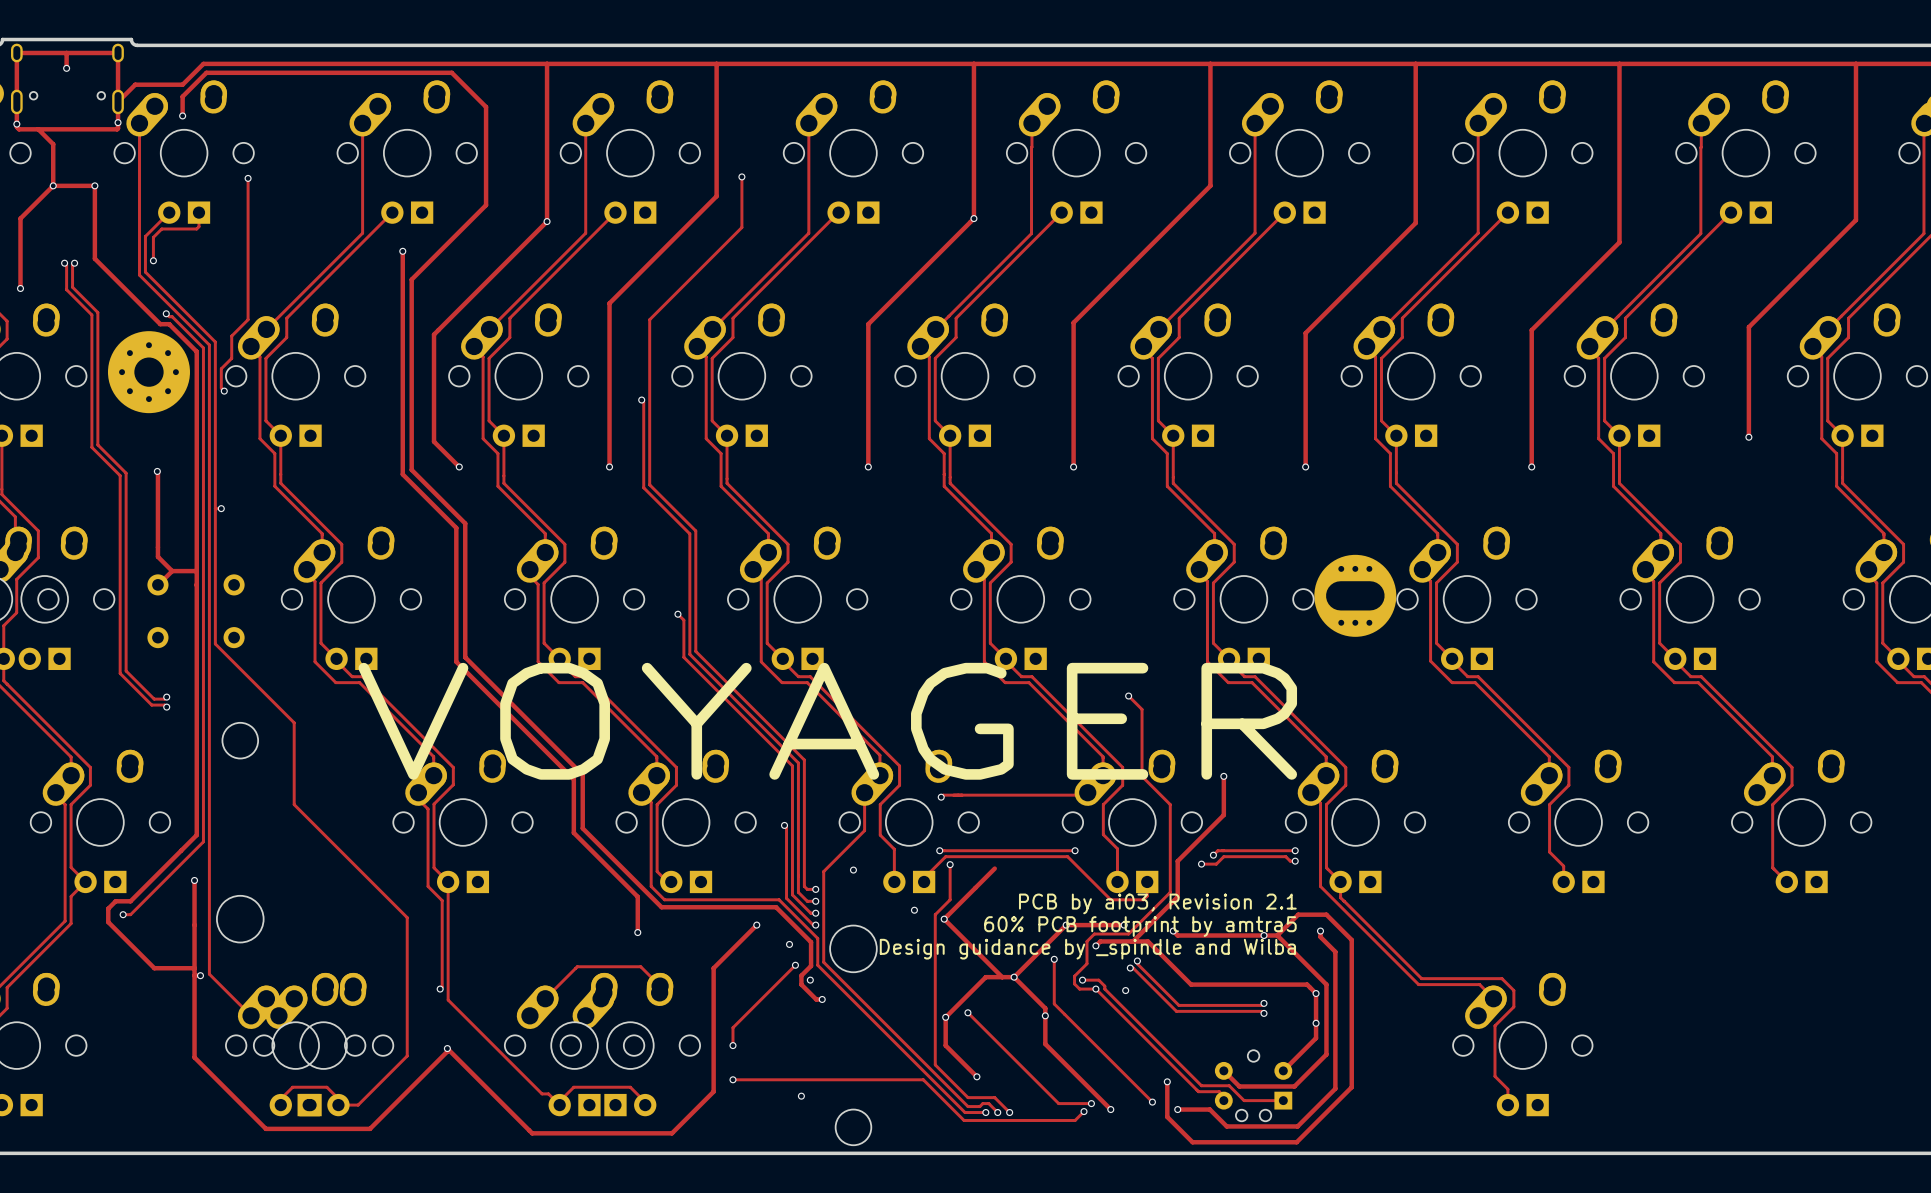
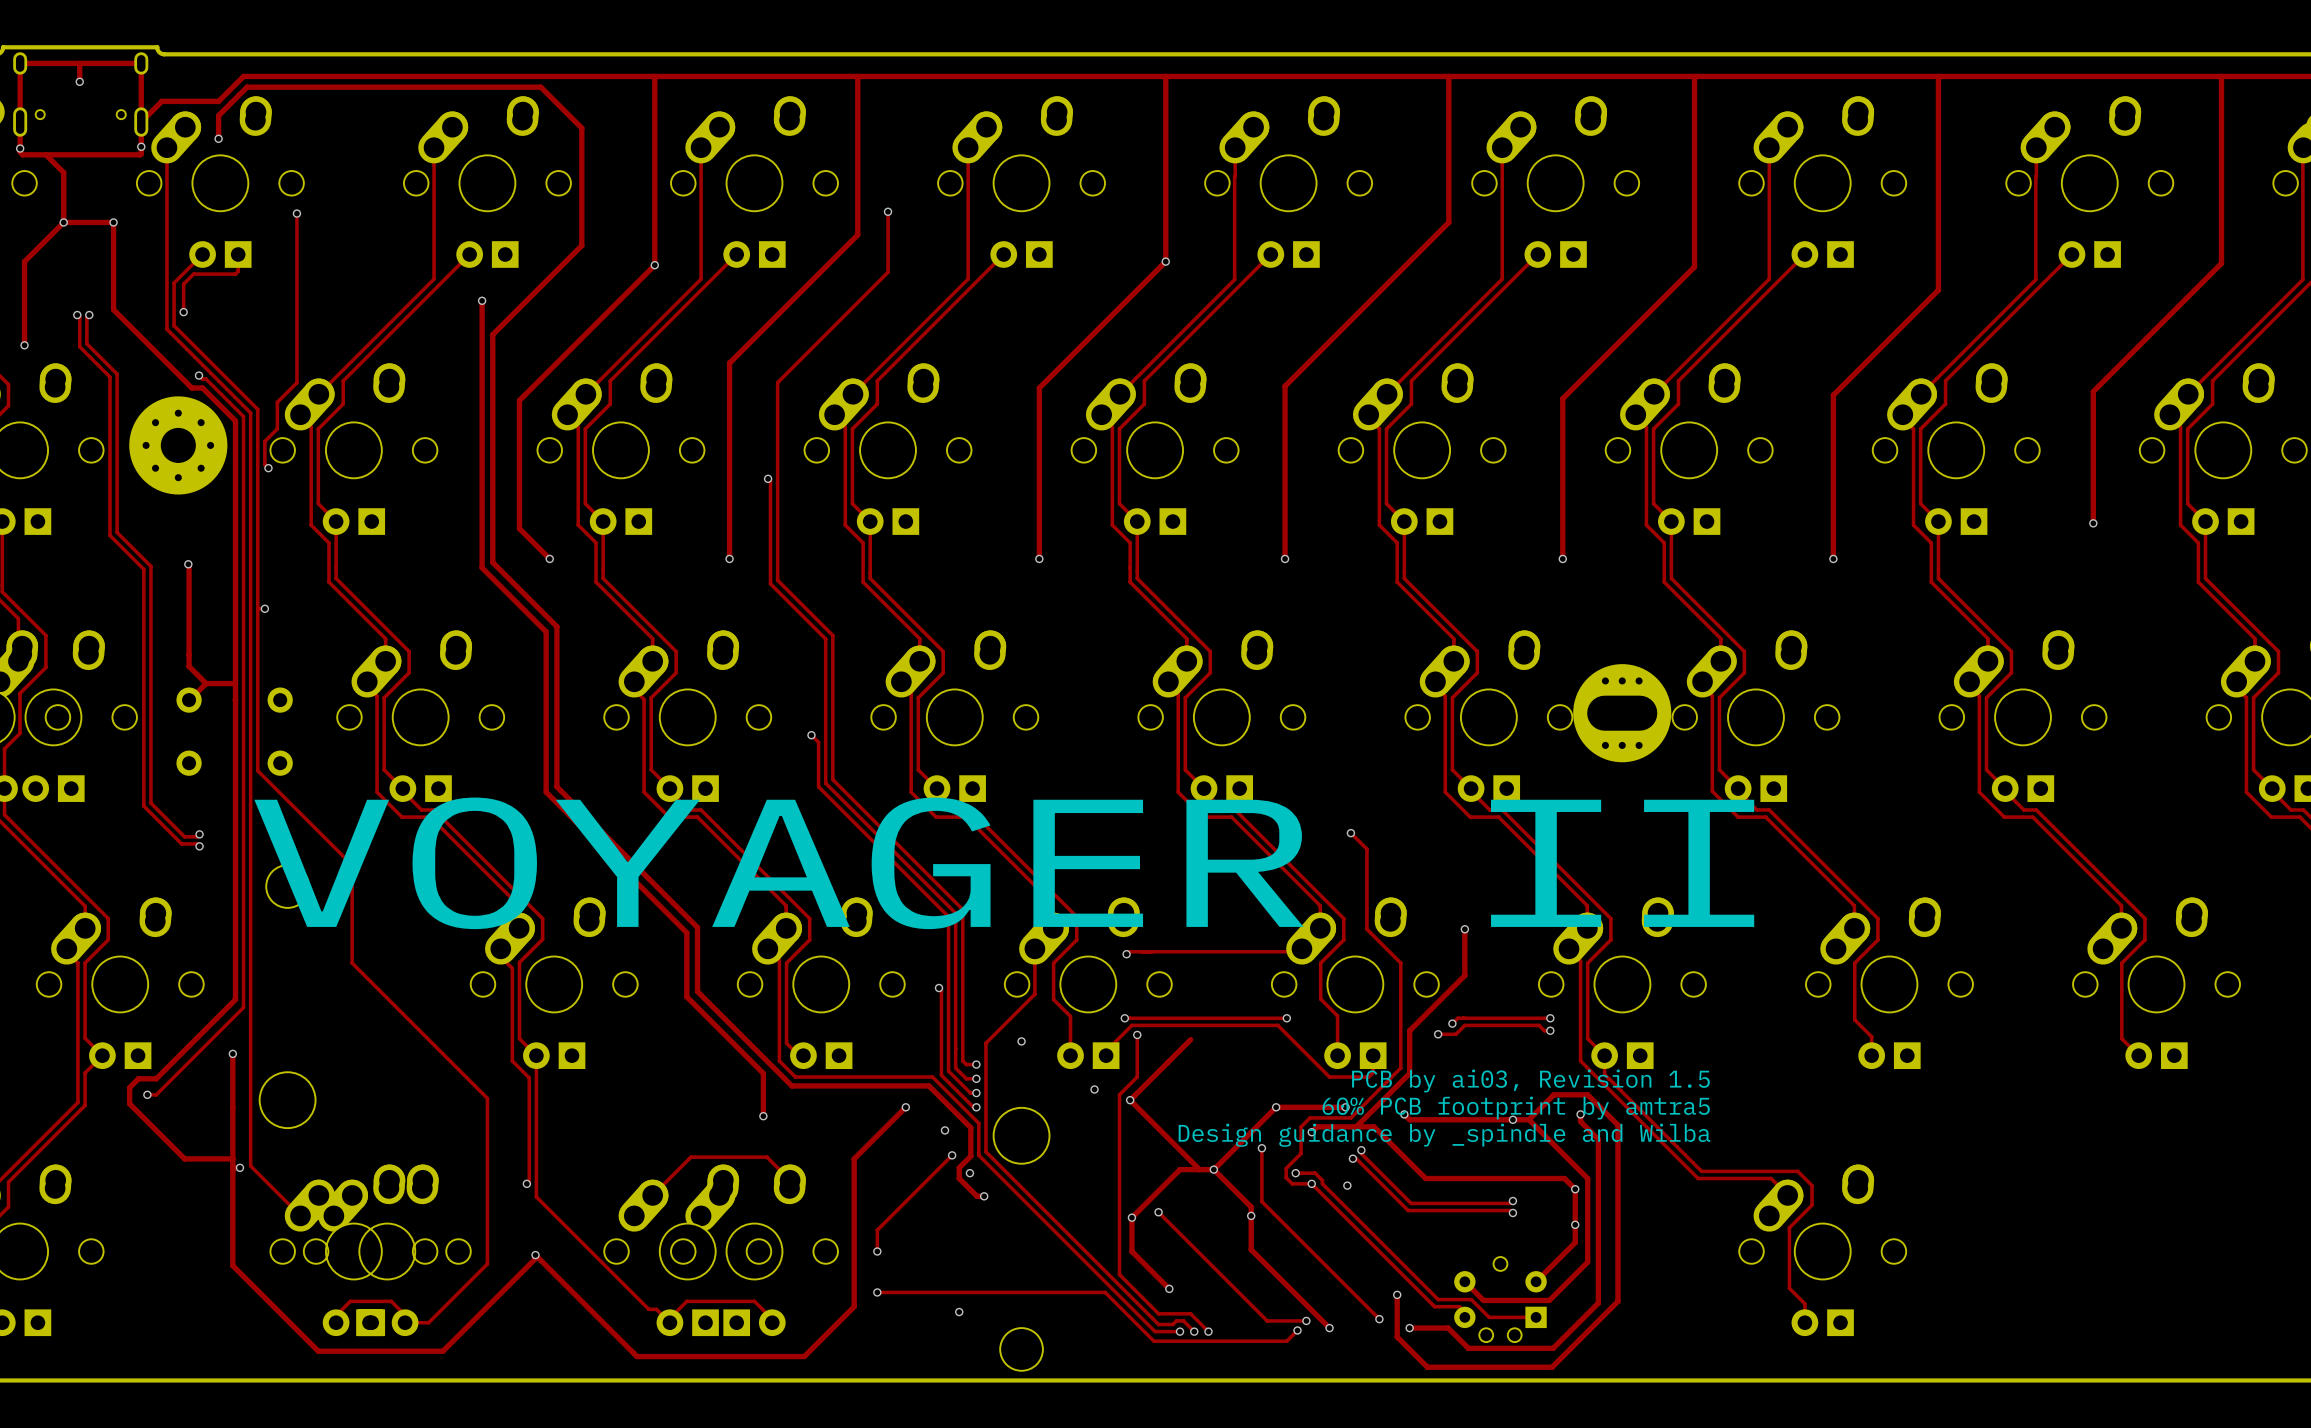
text: VOYAGER (827, 721) -> VOYAGER II (1004, 863)
text: PCB by ai03, Revision 2.1 (1157, 903) -> PCB by ai03, Revision 1.5 (1530, 1080)
text position: 60% PCB footprint by amtra5 (1140, 926) -> 60% PCB footprint by amtra5 (1516, 1108)
text position: Design guidance by _spindle and Wilba (1087, 949) -> Design guidance by _spindle and Wilba (1444, 1135)

